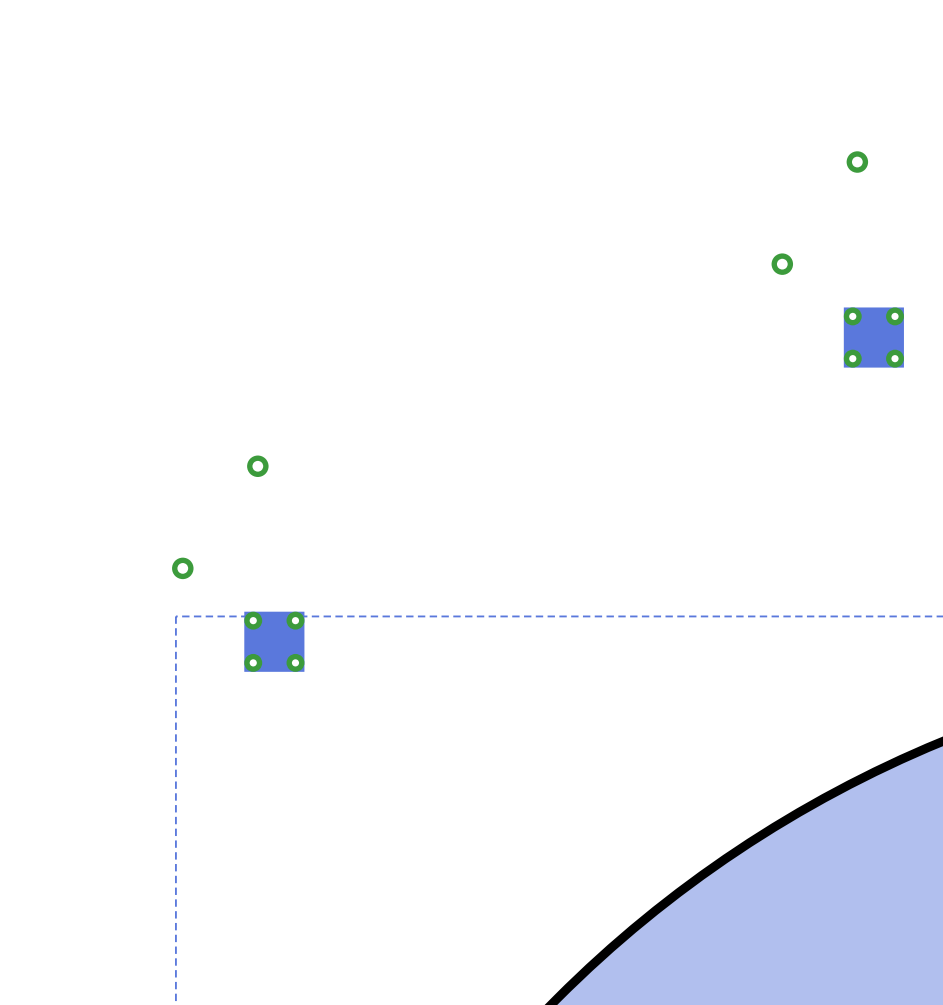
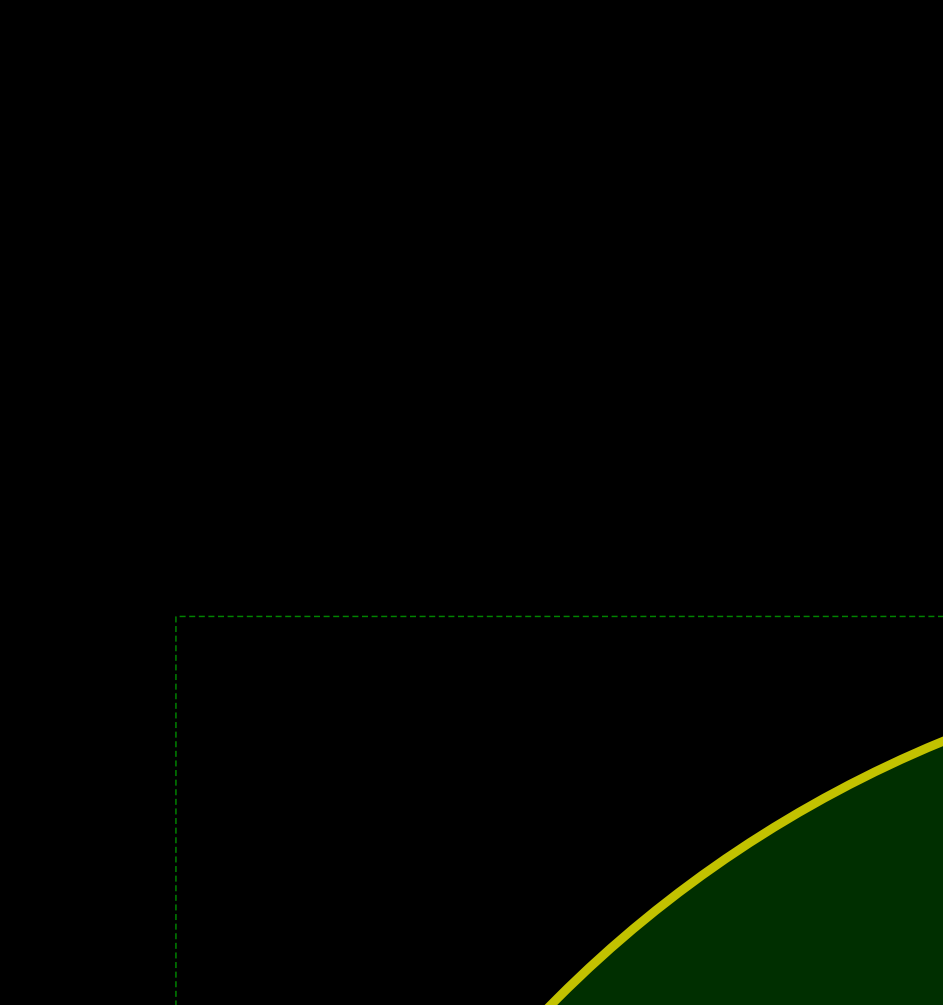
via: (857, 162) -> none
via: (782, 264) -> none
part: (873, 337) -> none
via: (257, 466) -> none
via: (182, 568) -> none
part: (274, 641) -> none

